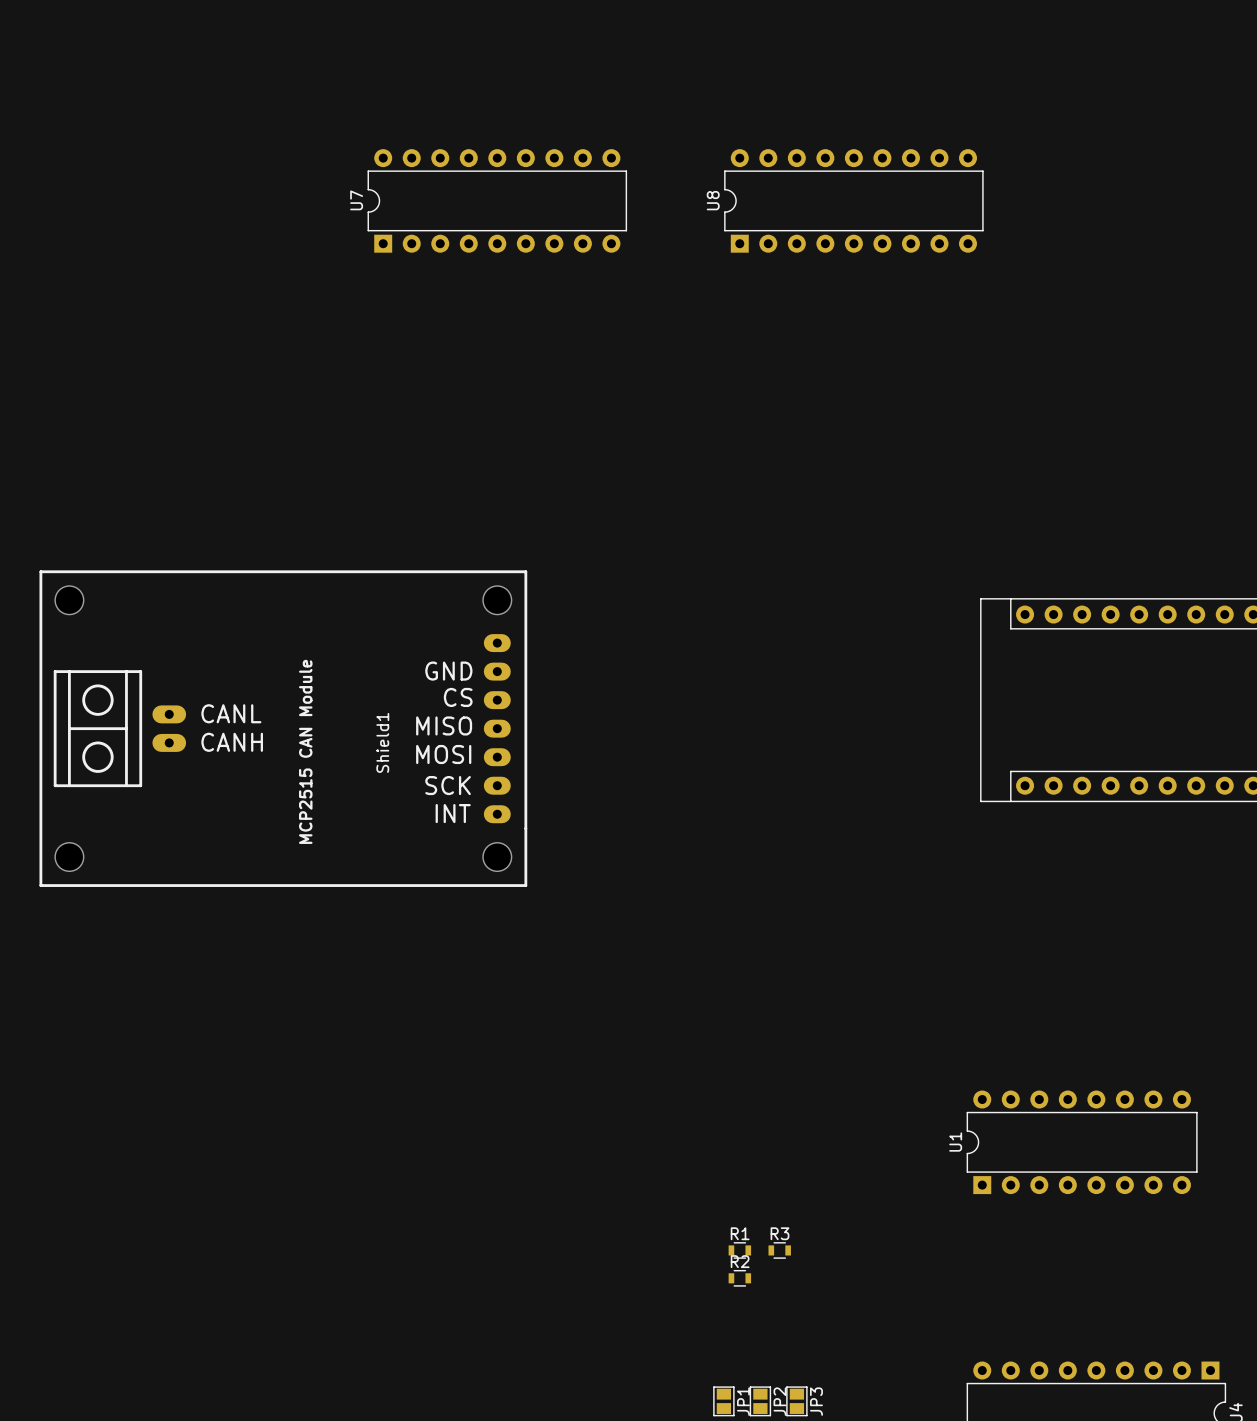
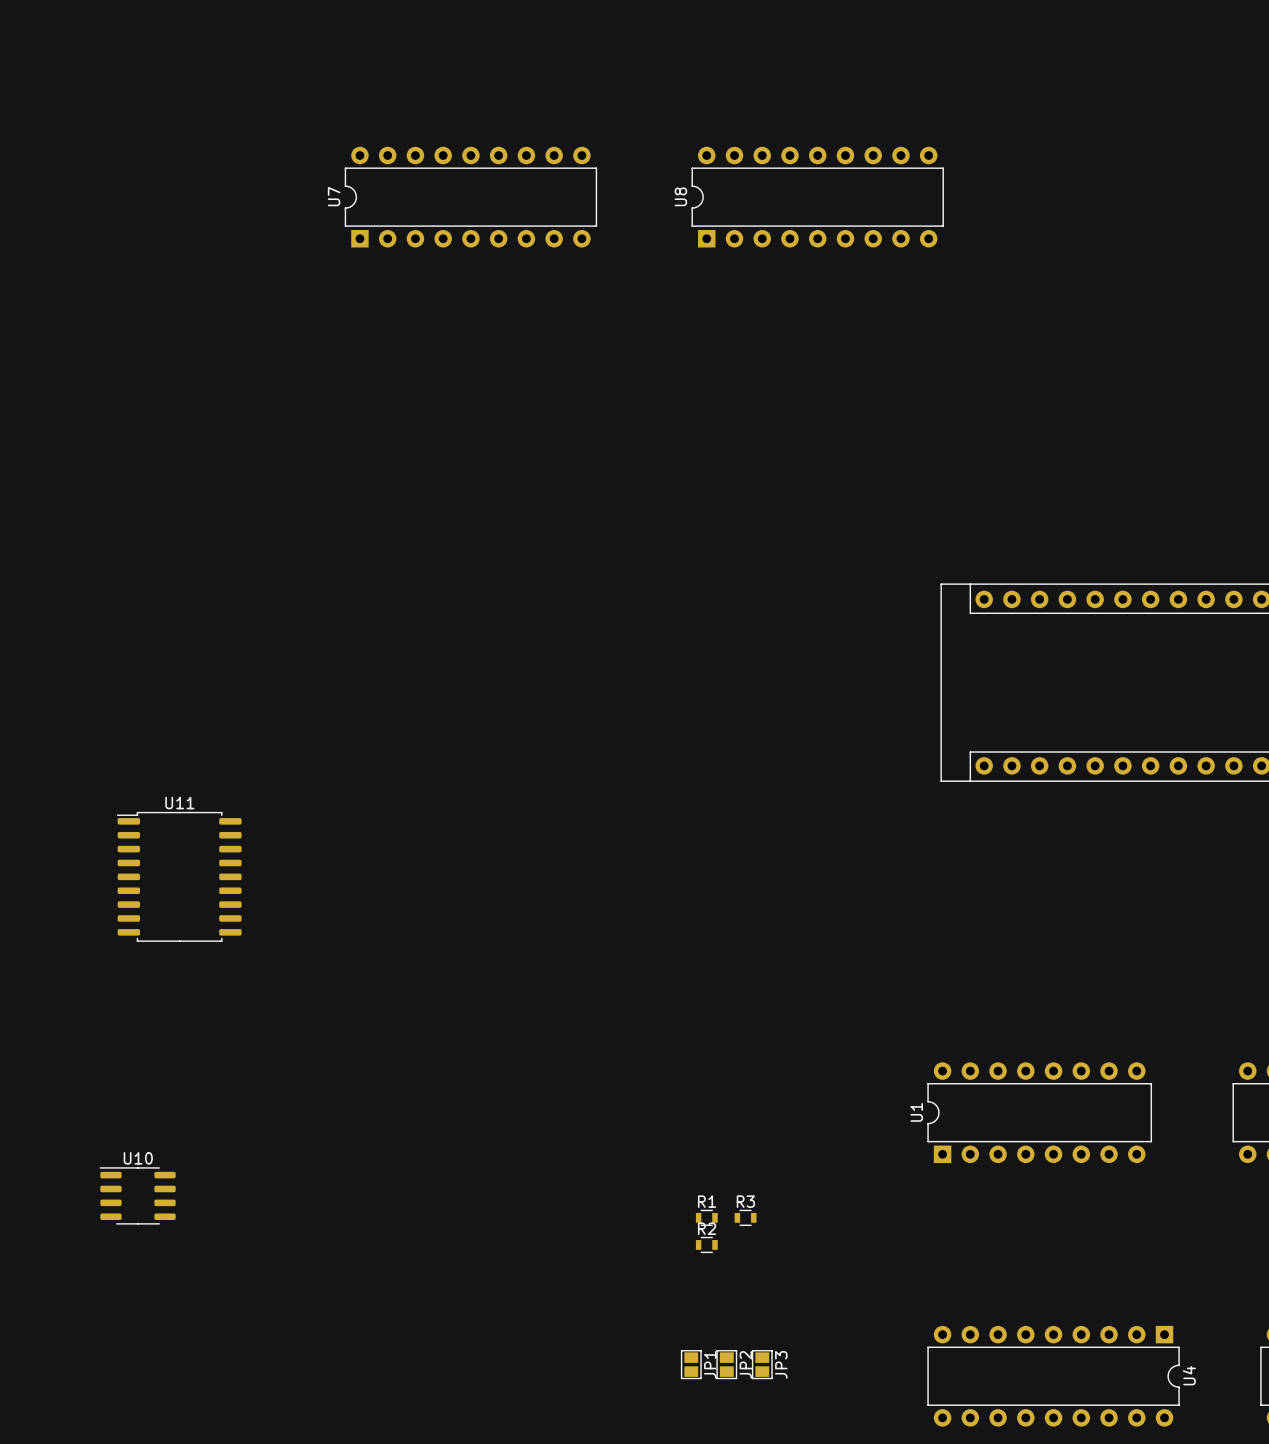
Shield1: (283, 728) -> none
U11: none -> (179, 876)
U10: none -> (137, 1195)

